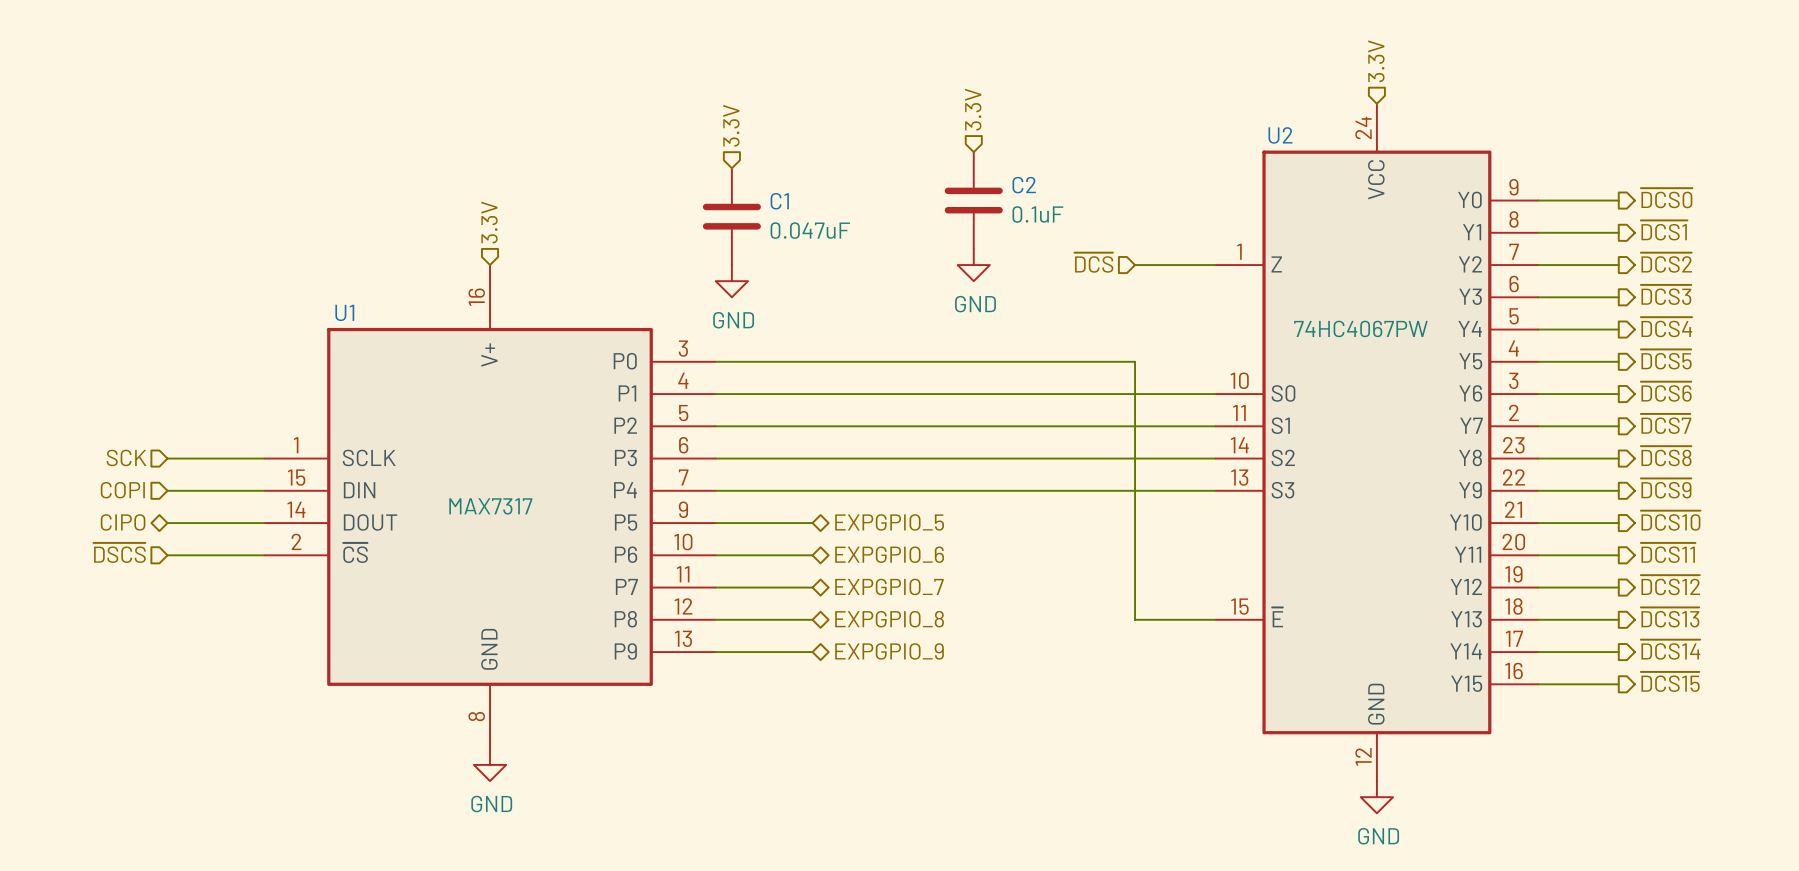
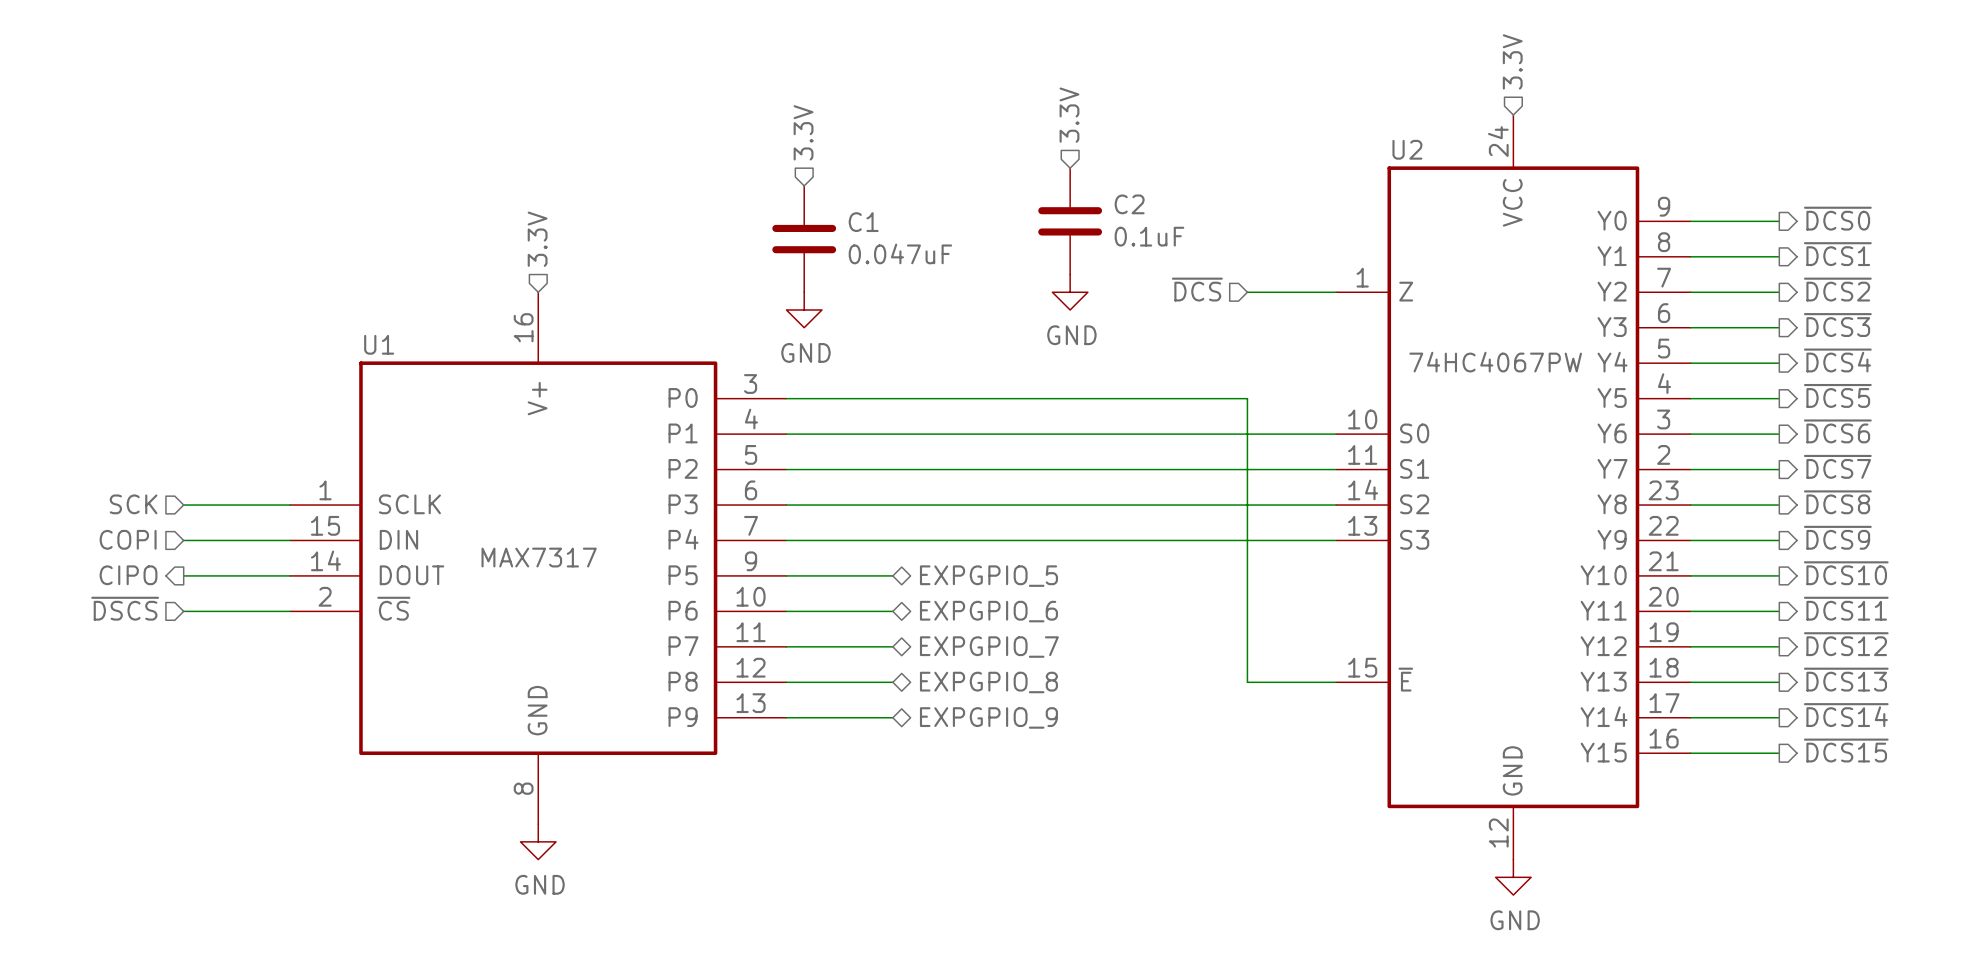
hierarchical label shape: bidirectional (123, 522) -> output (128, 575)

